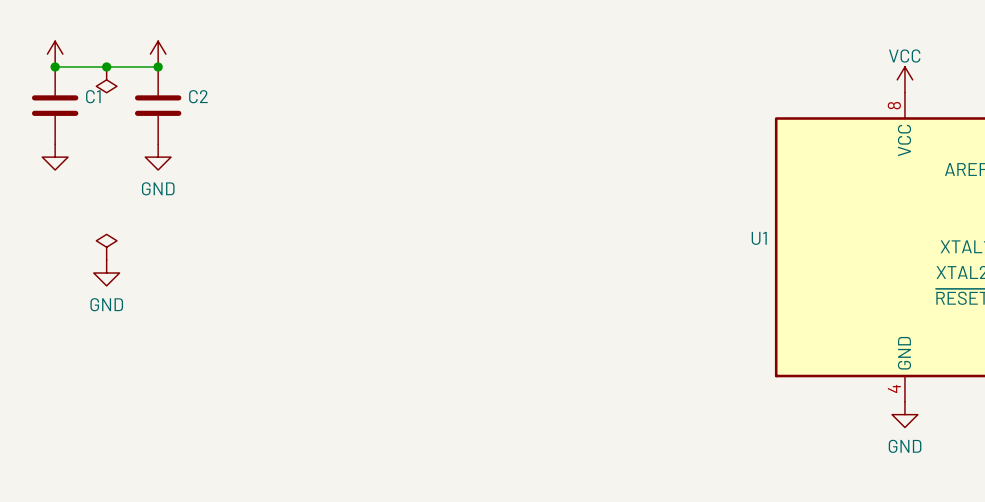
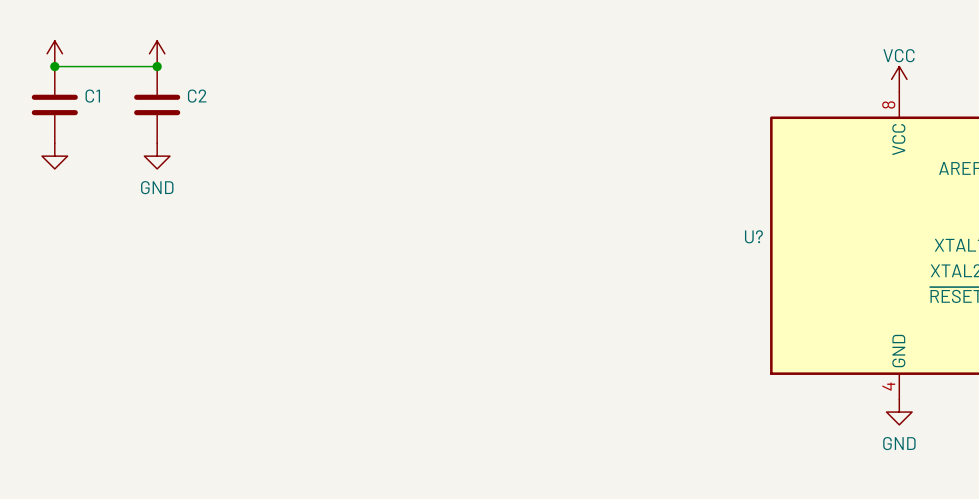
junction: (106, 66) -> none
power symbol: (106, 79) -> none
U1 name: U1 (759, 238) -> U? (753, 236)
power symbol: (106, 247) -> none
power symbol: GND (106, 273) -> none

